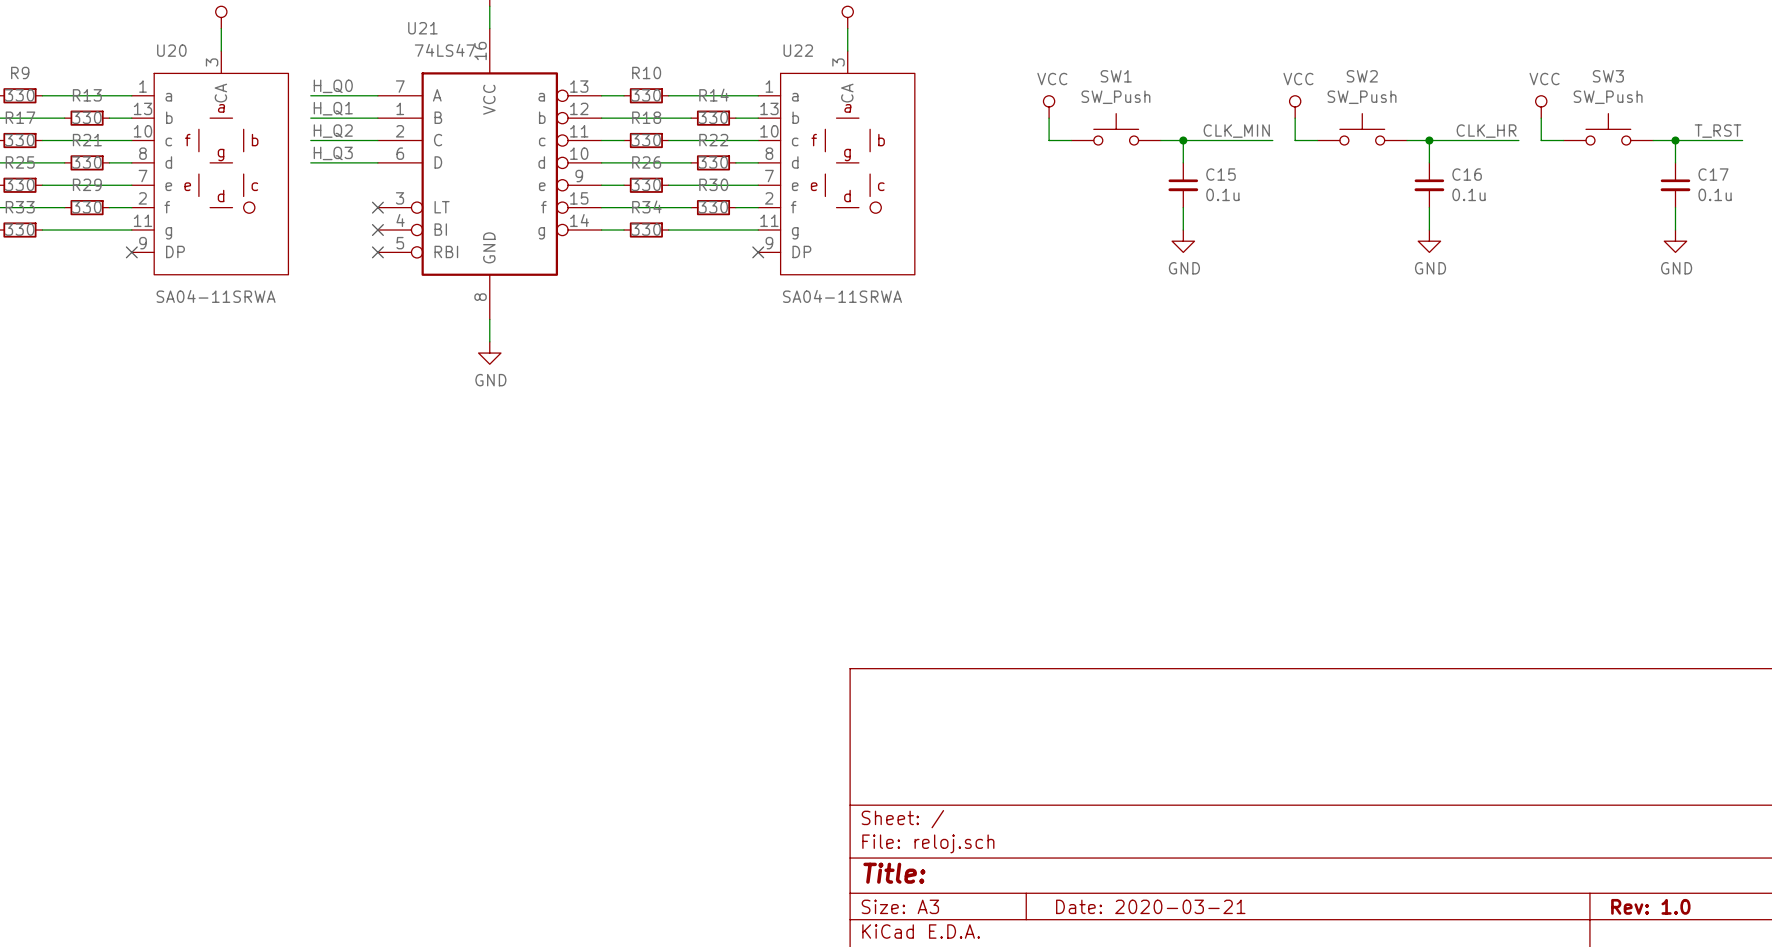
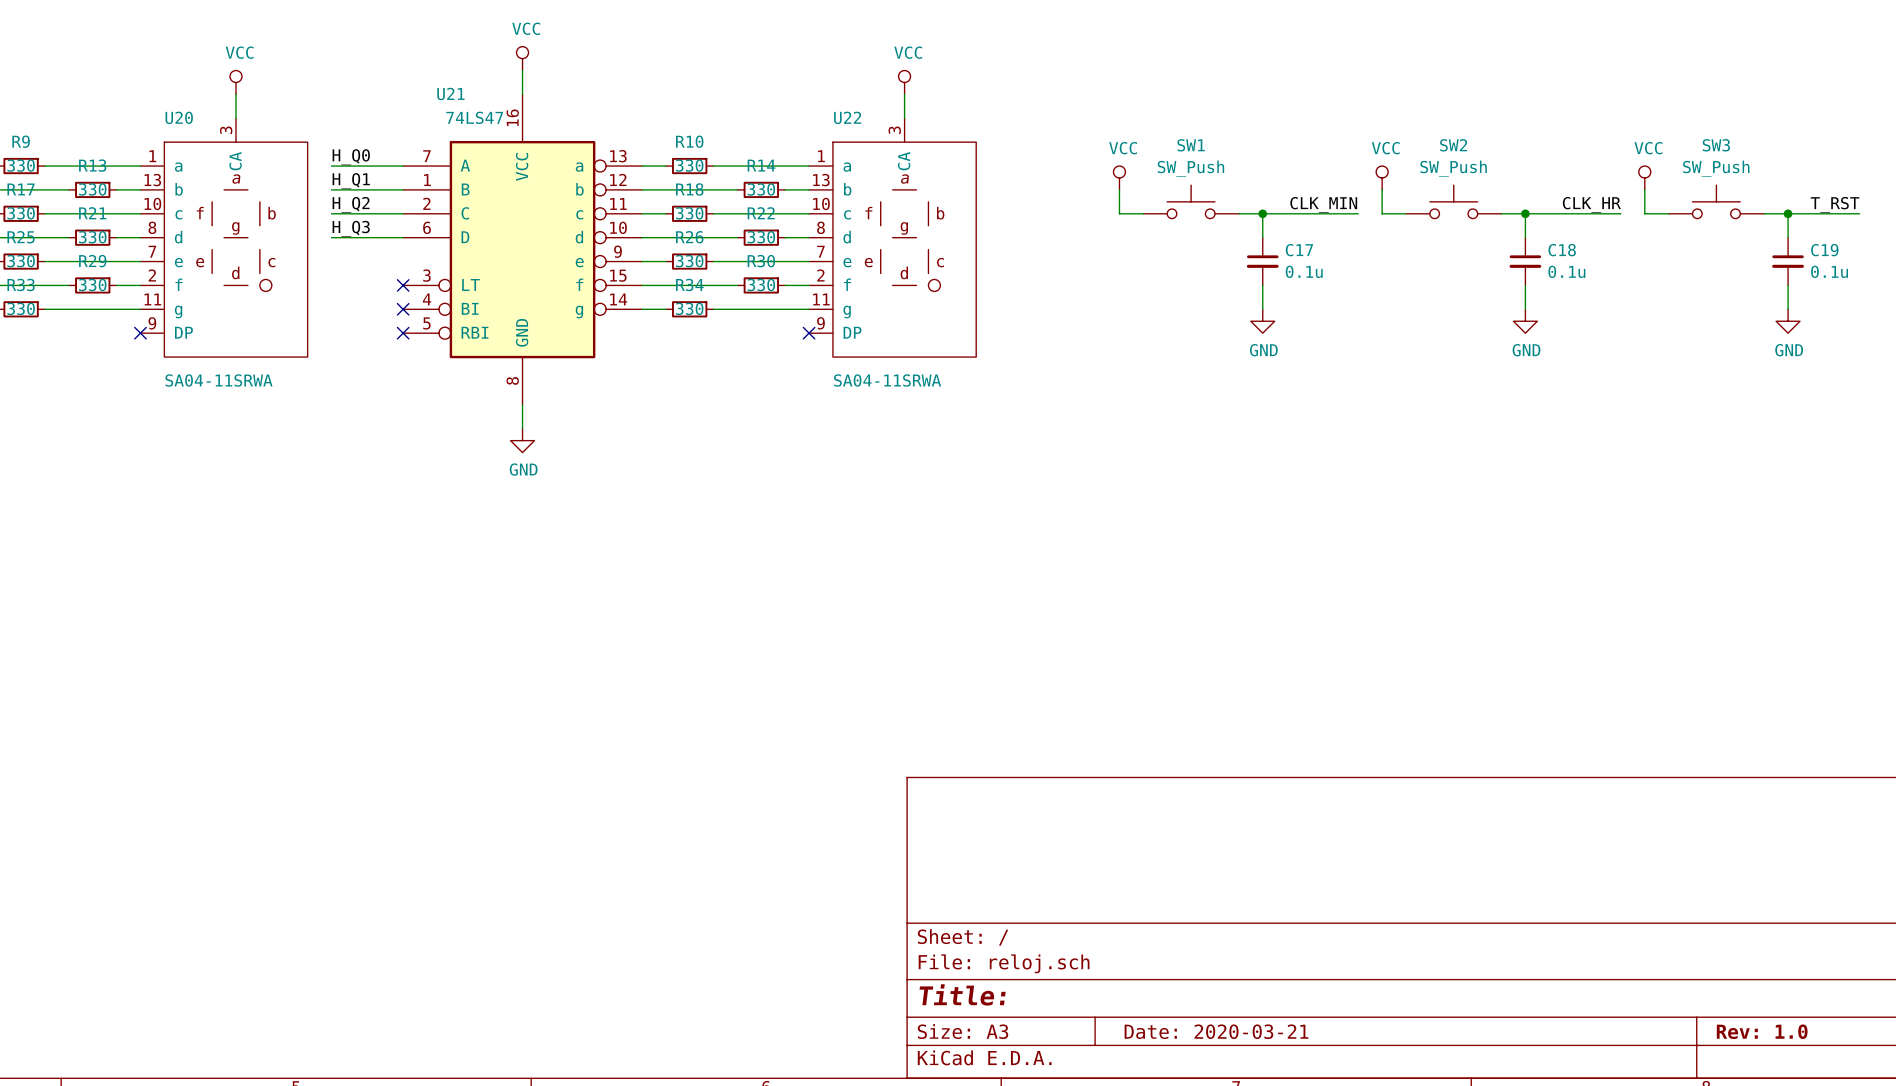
C15 name: C15 (1221, 174) -> C17 (1299, 250)
C16 name: C16 (1467, 174) -> C18 (1562, 250)
C17 name: C17 (1713, 174) -> C19 (1824, 250)

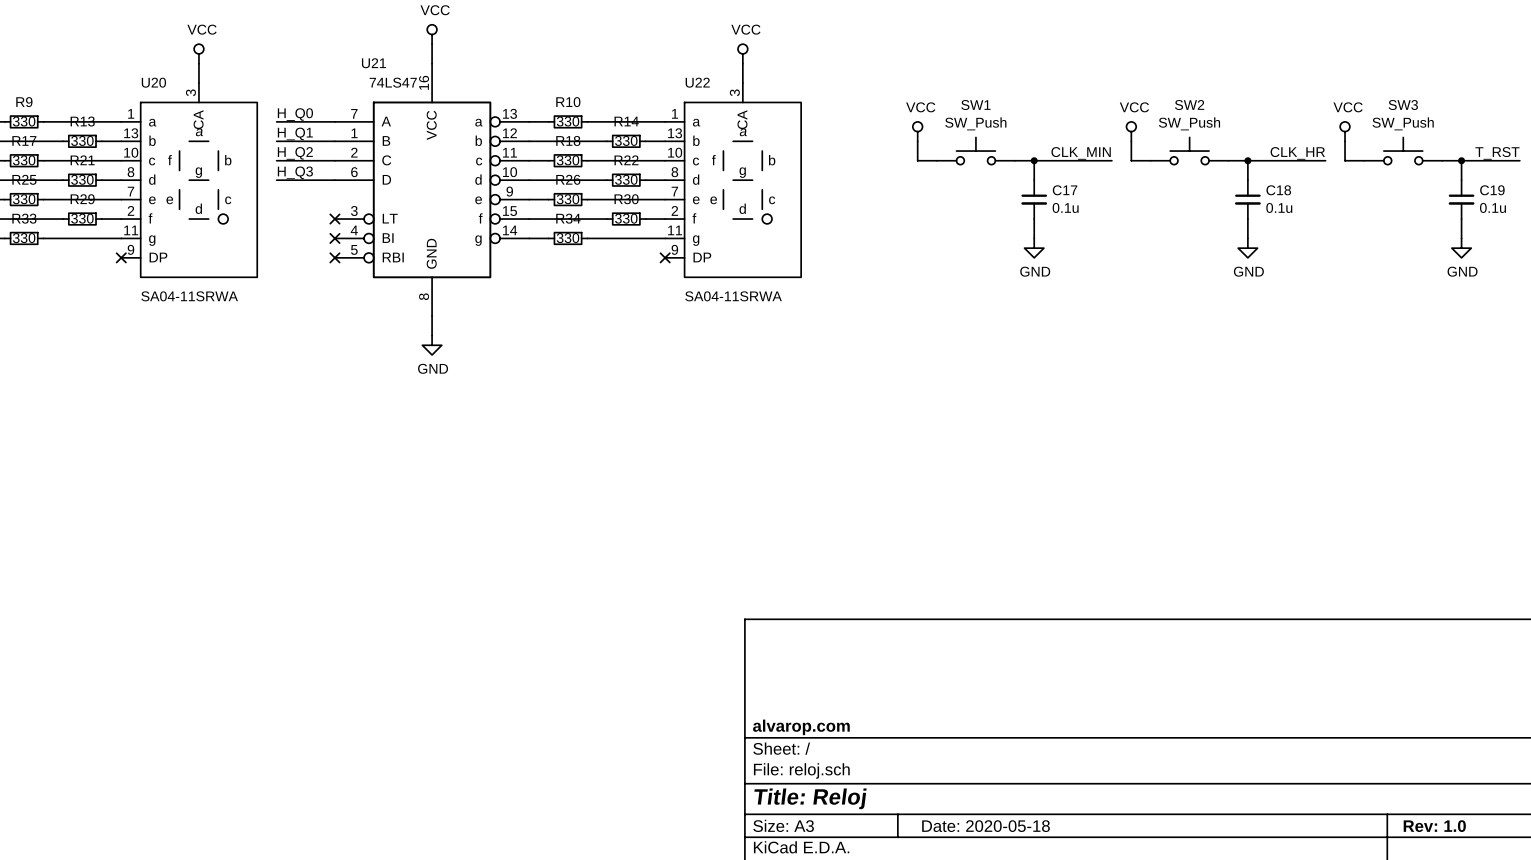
title block: none -> alvarop.com (801, 727)
title block: Title: (962, 994) -> Title: Reloj (810, 798)
title block: Date: 2020-03-21 (1216, 1031) -> Date: 2020-05-18 (986, 826)

